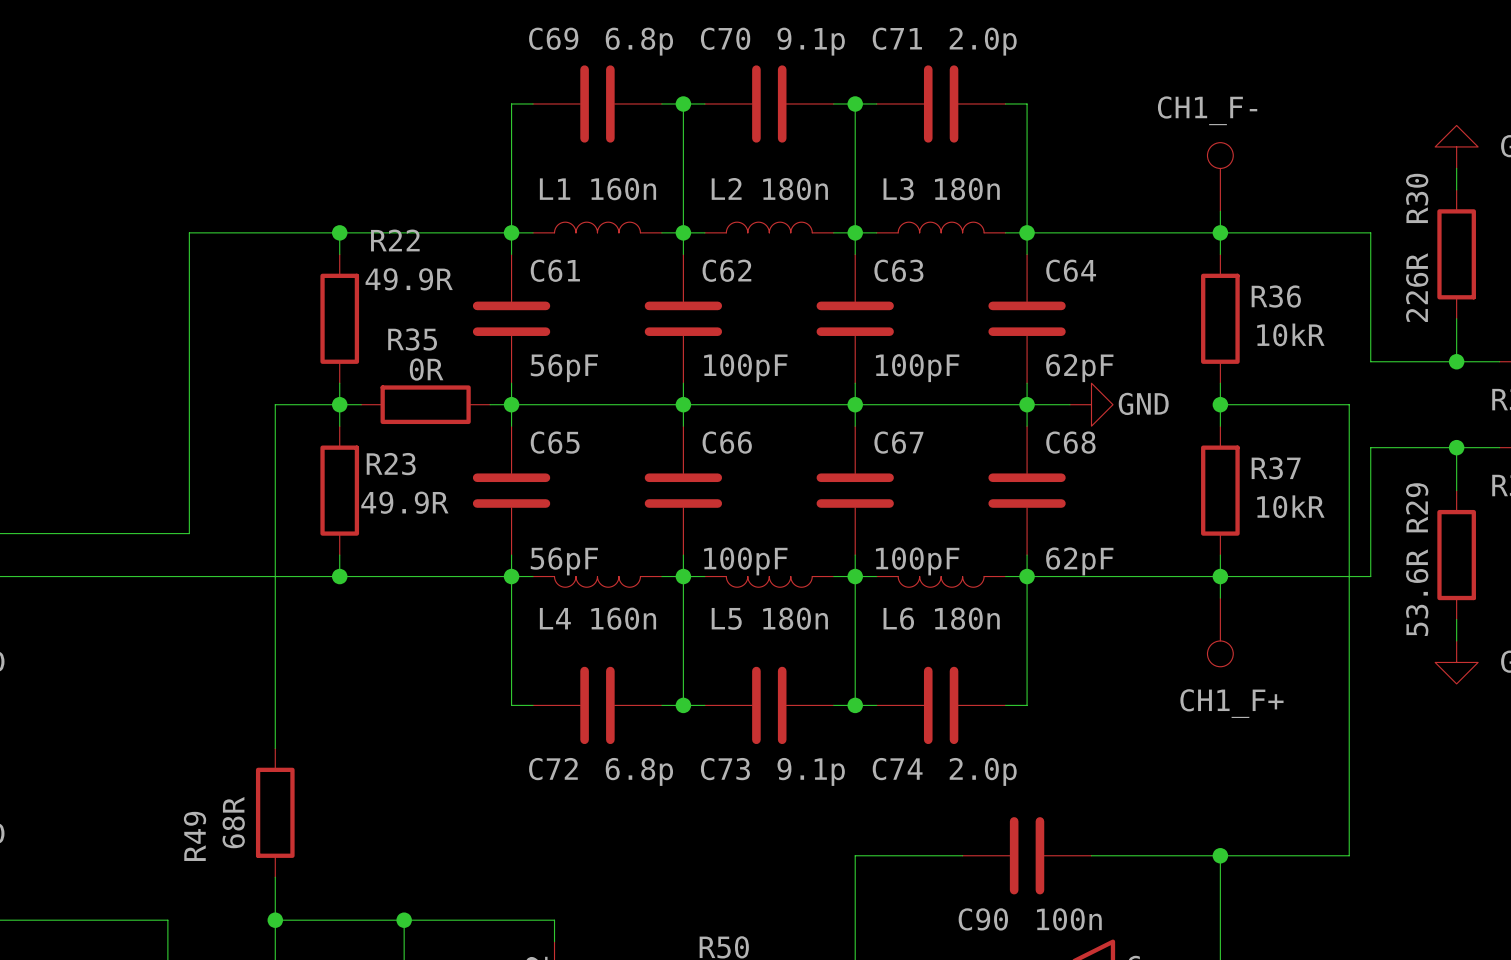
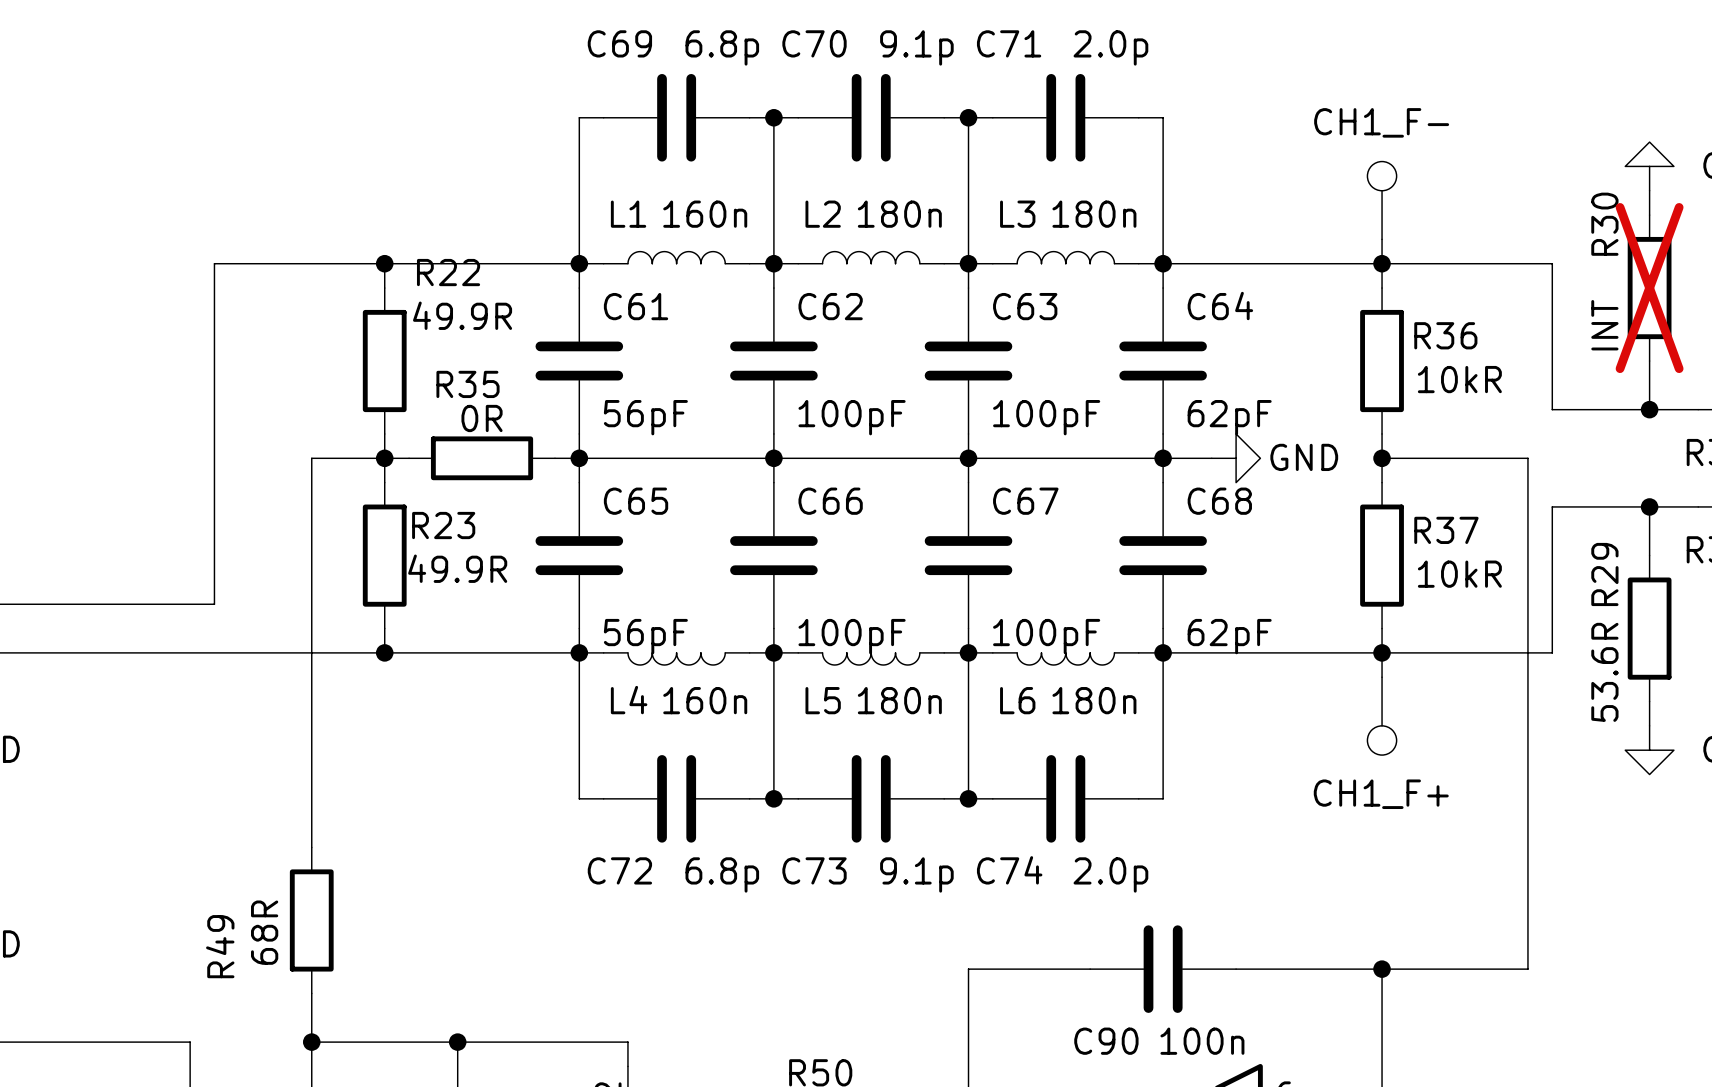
R30 do-not-place cross: none -> (1649, 288)
R30 value: 226R (1417, 287) -> INT (1604, 325)

